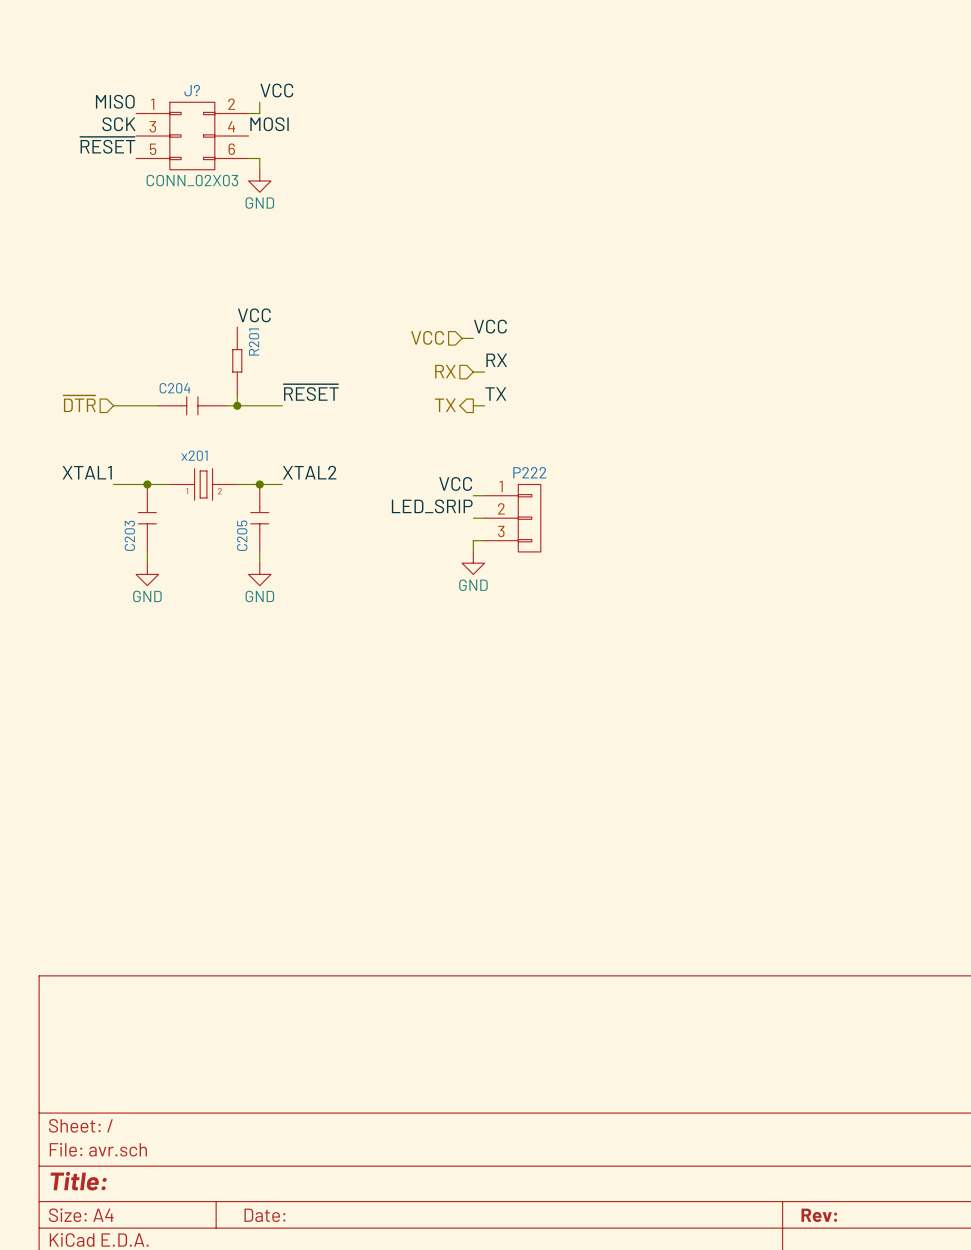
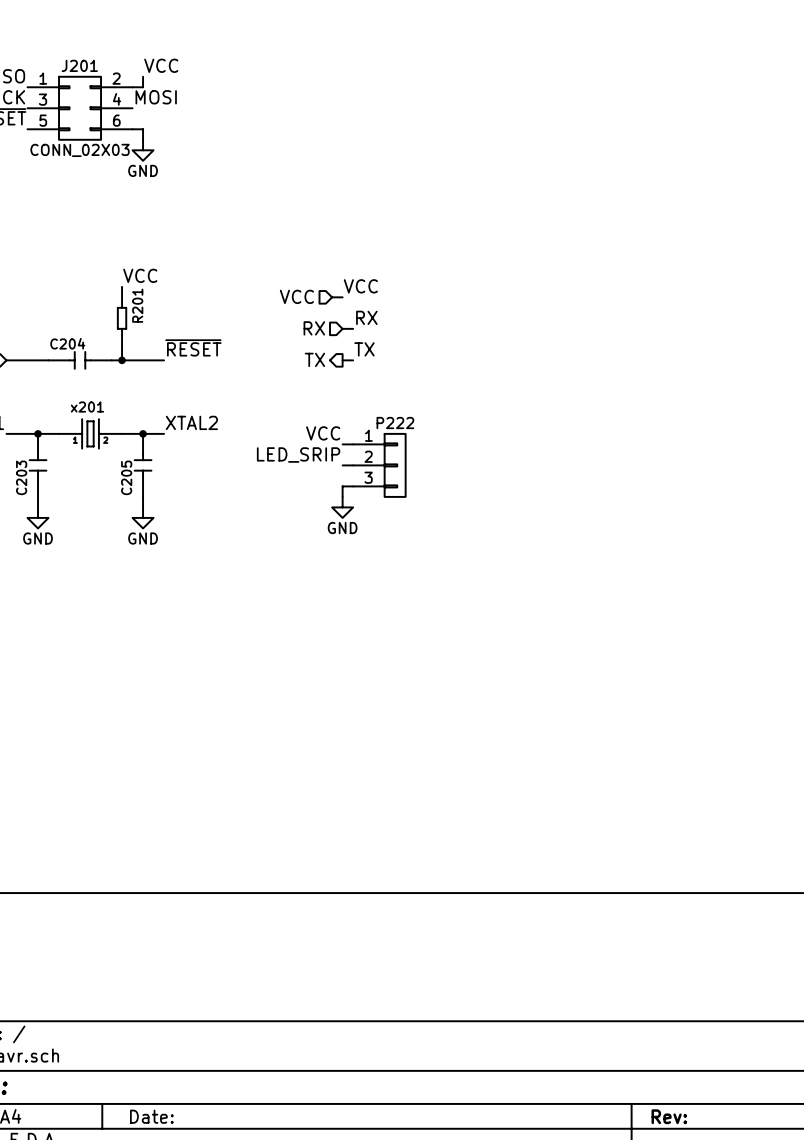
J? name: J? (192, 90) -> J201 (79, 65)

